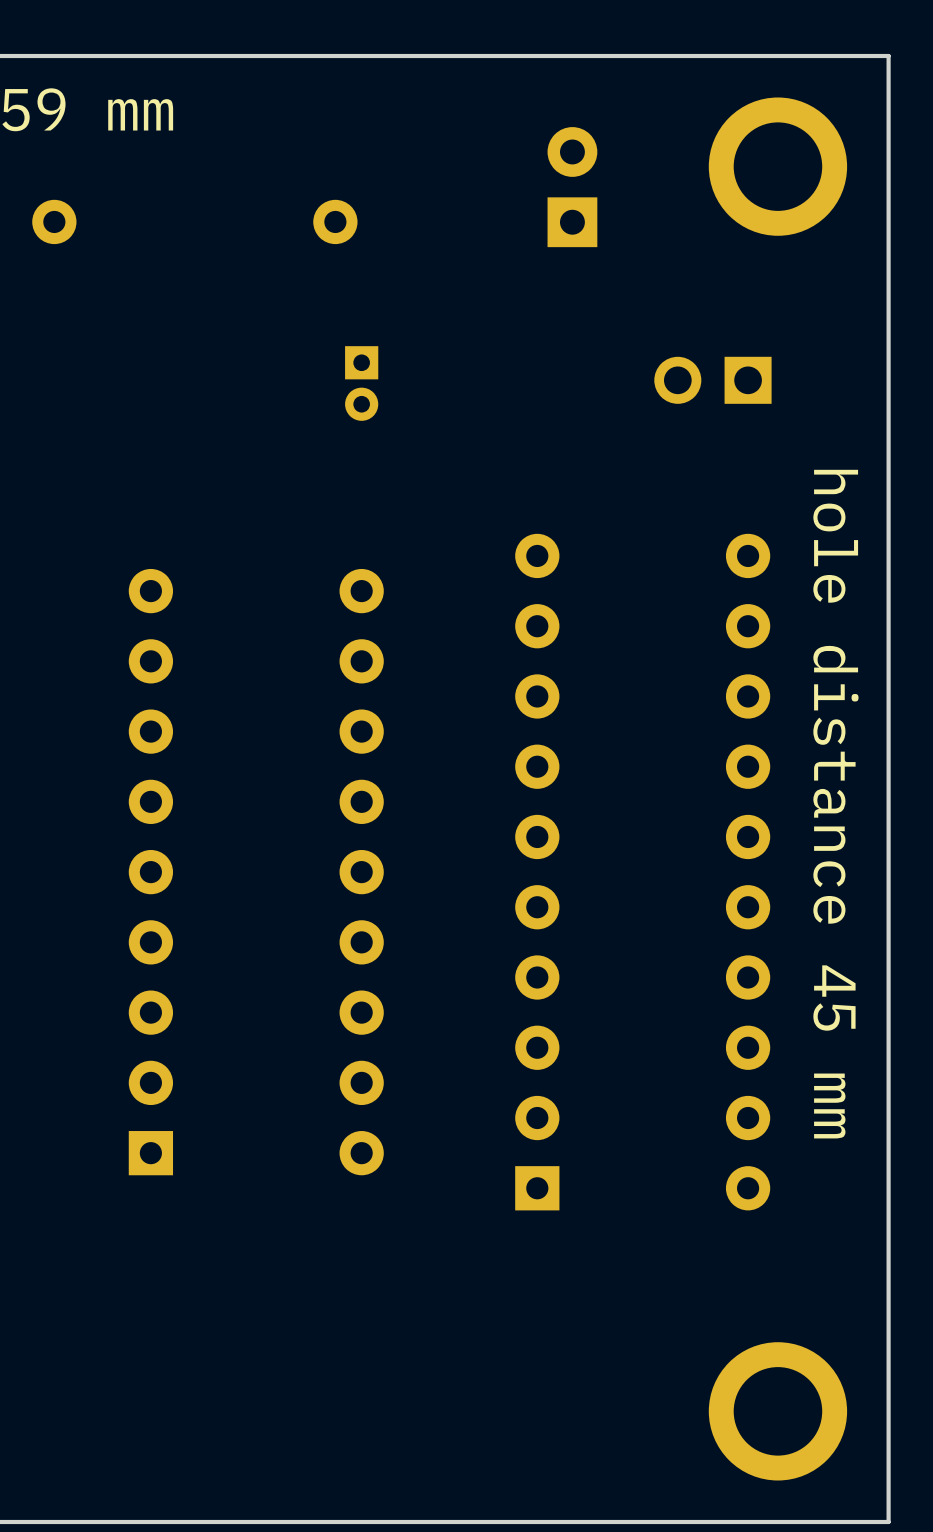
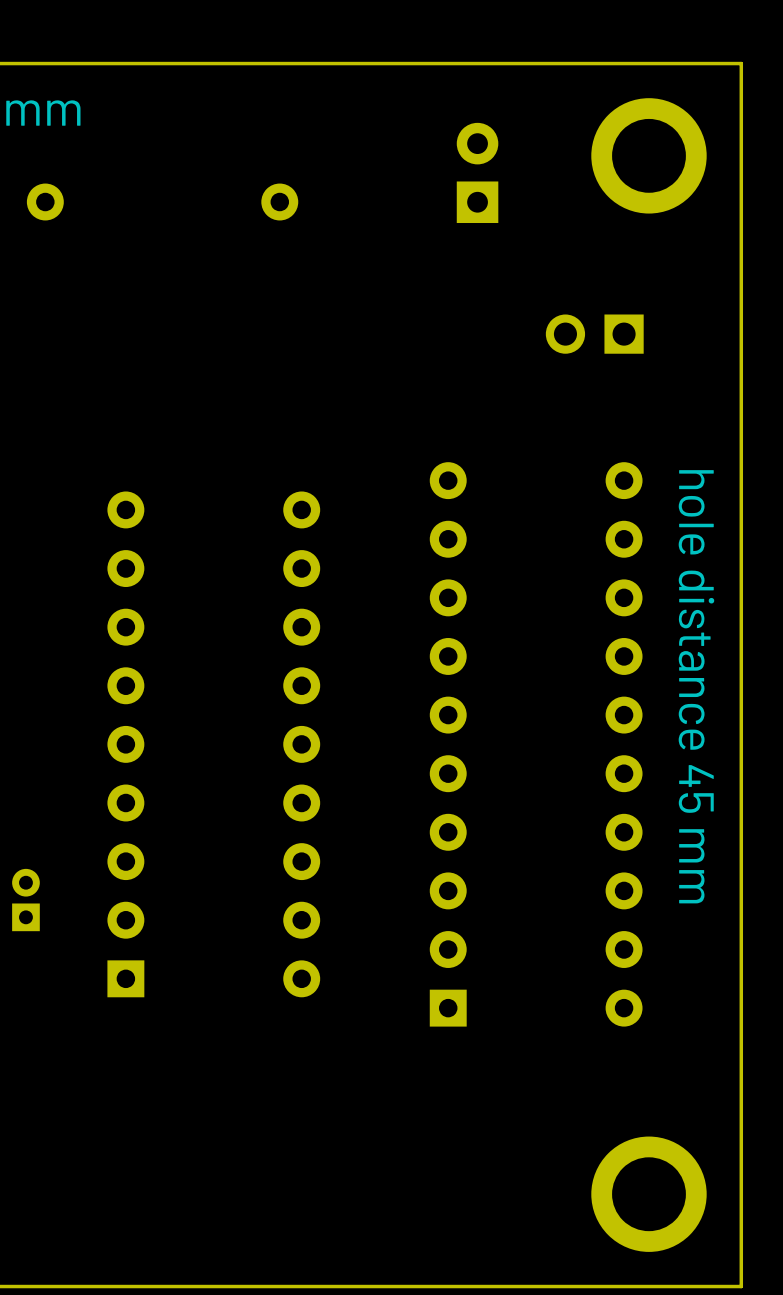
part: (361, 383) -> none
part: none -> (25, 900)

